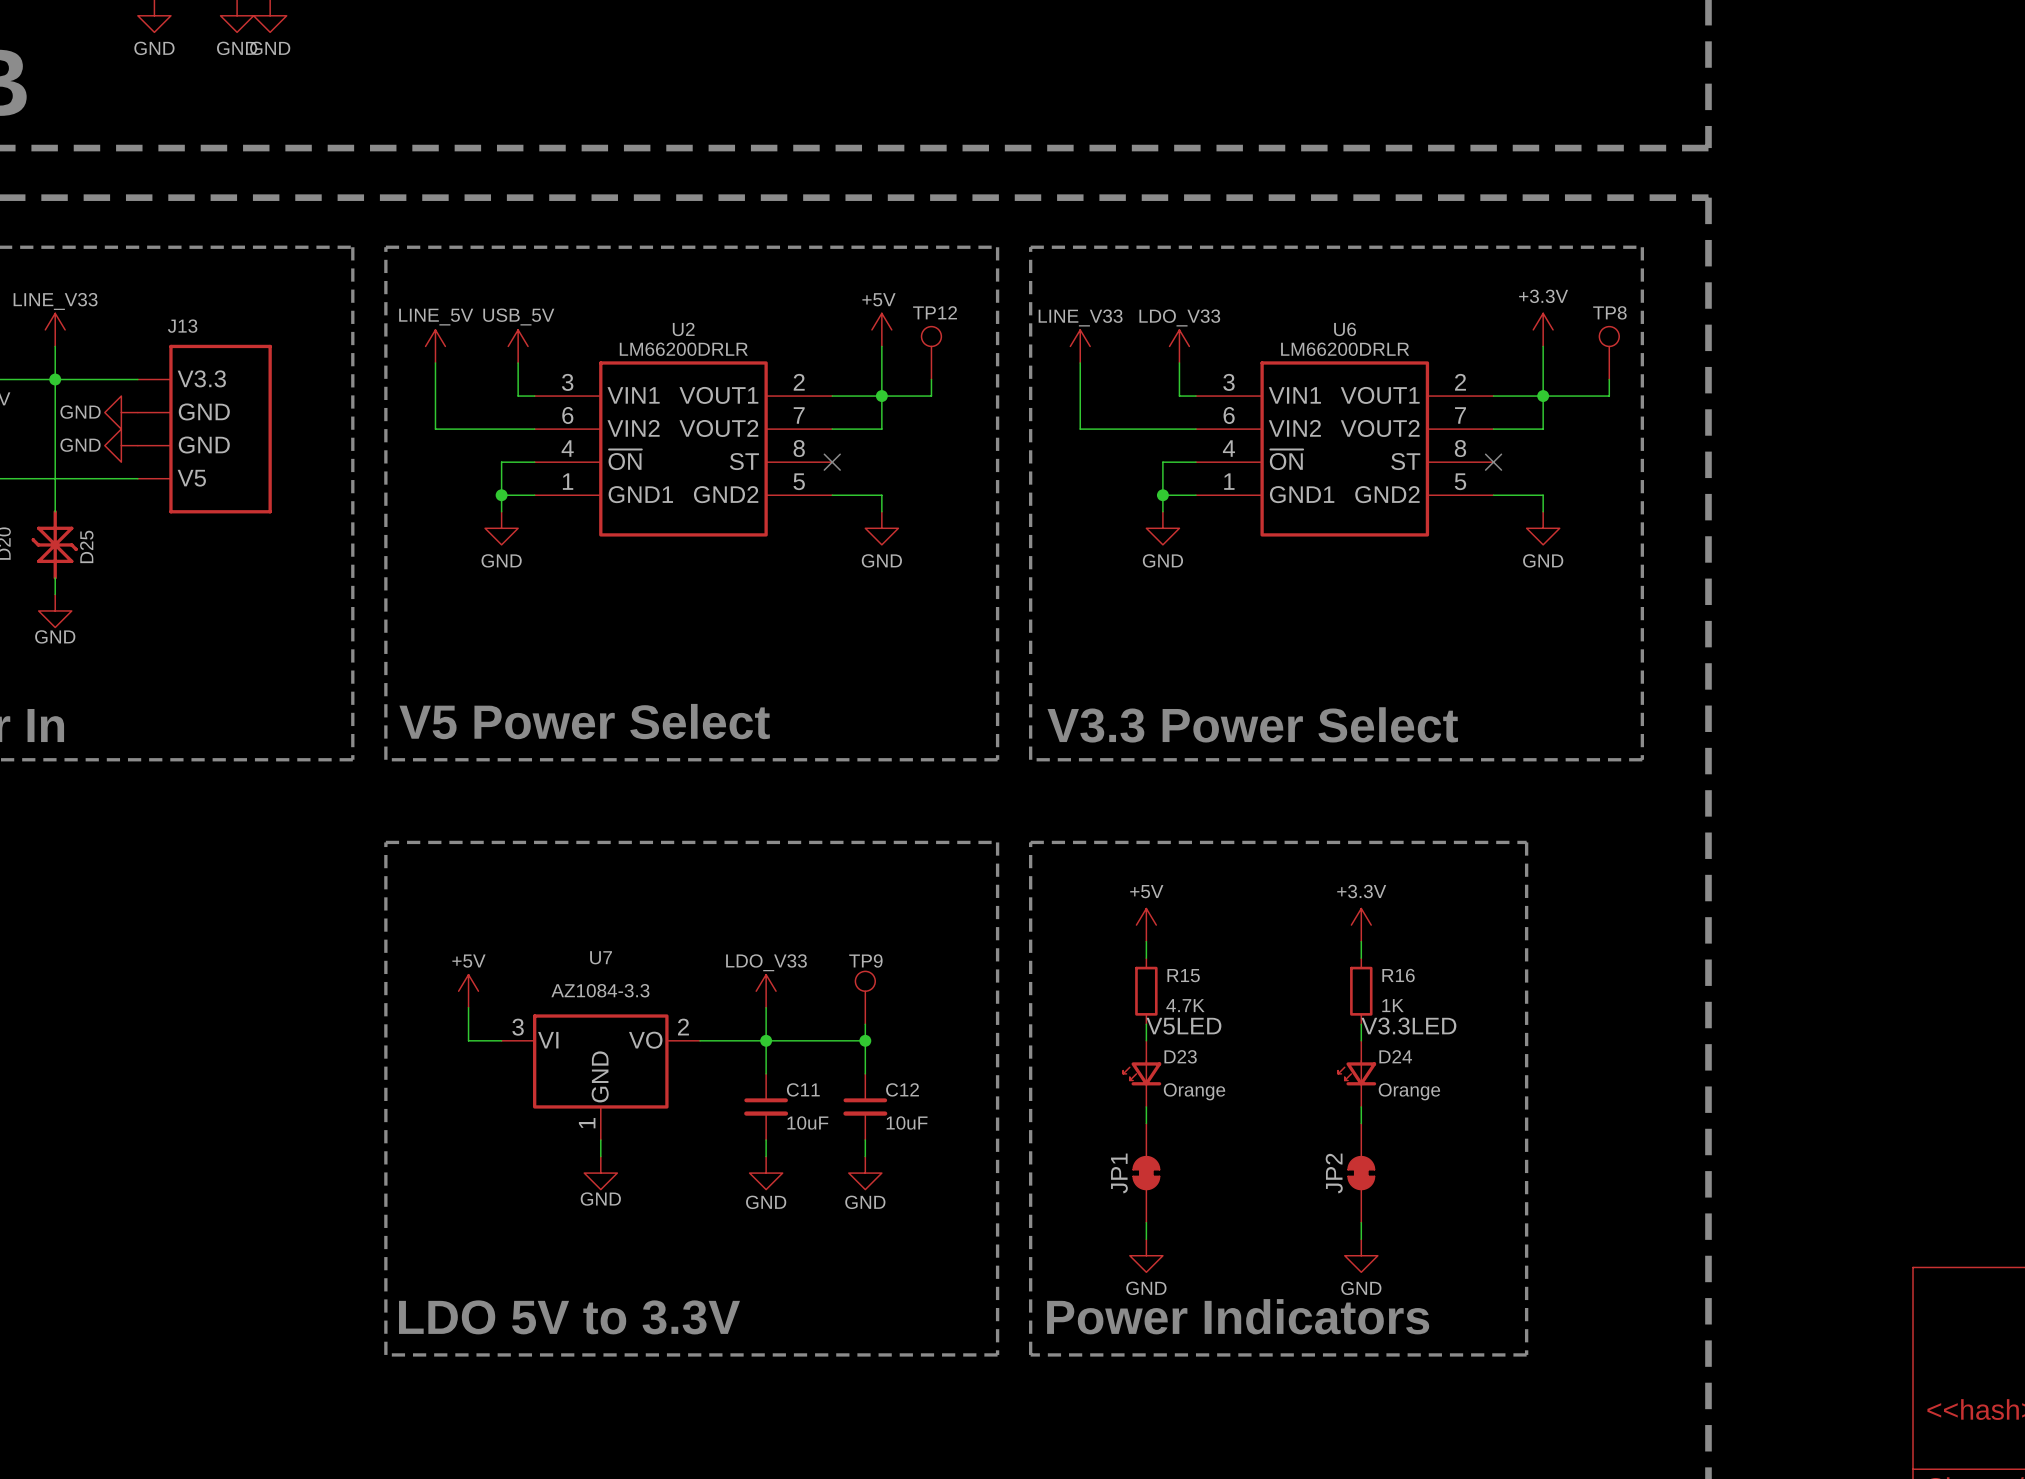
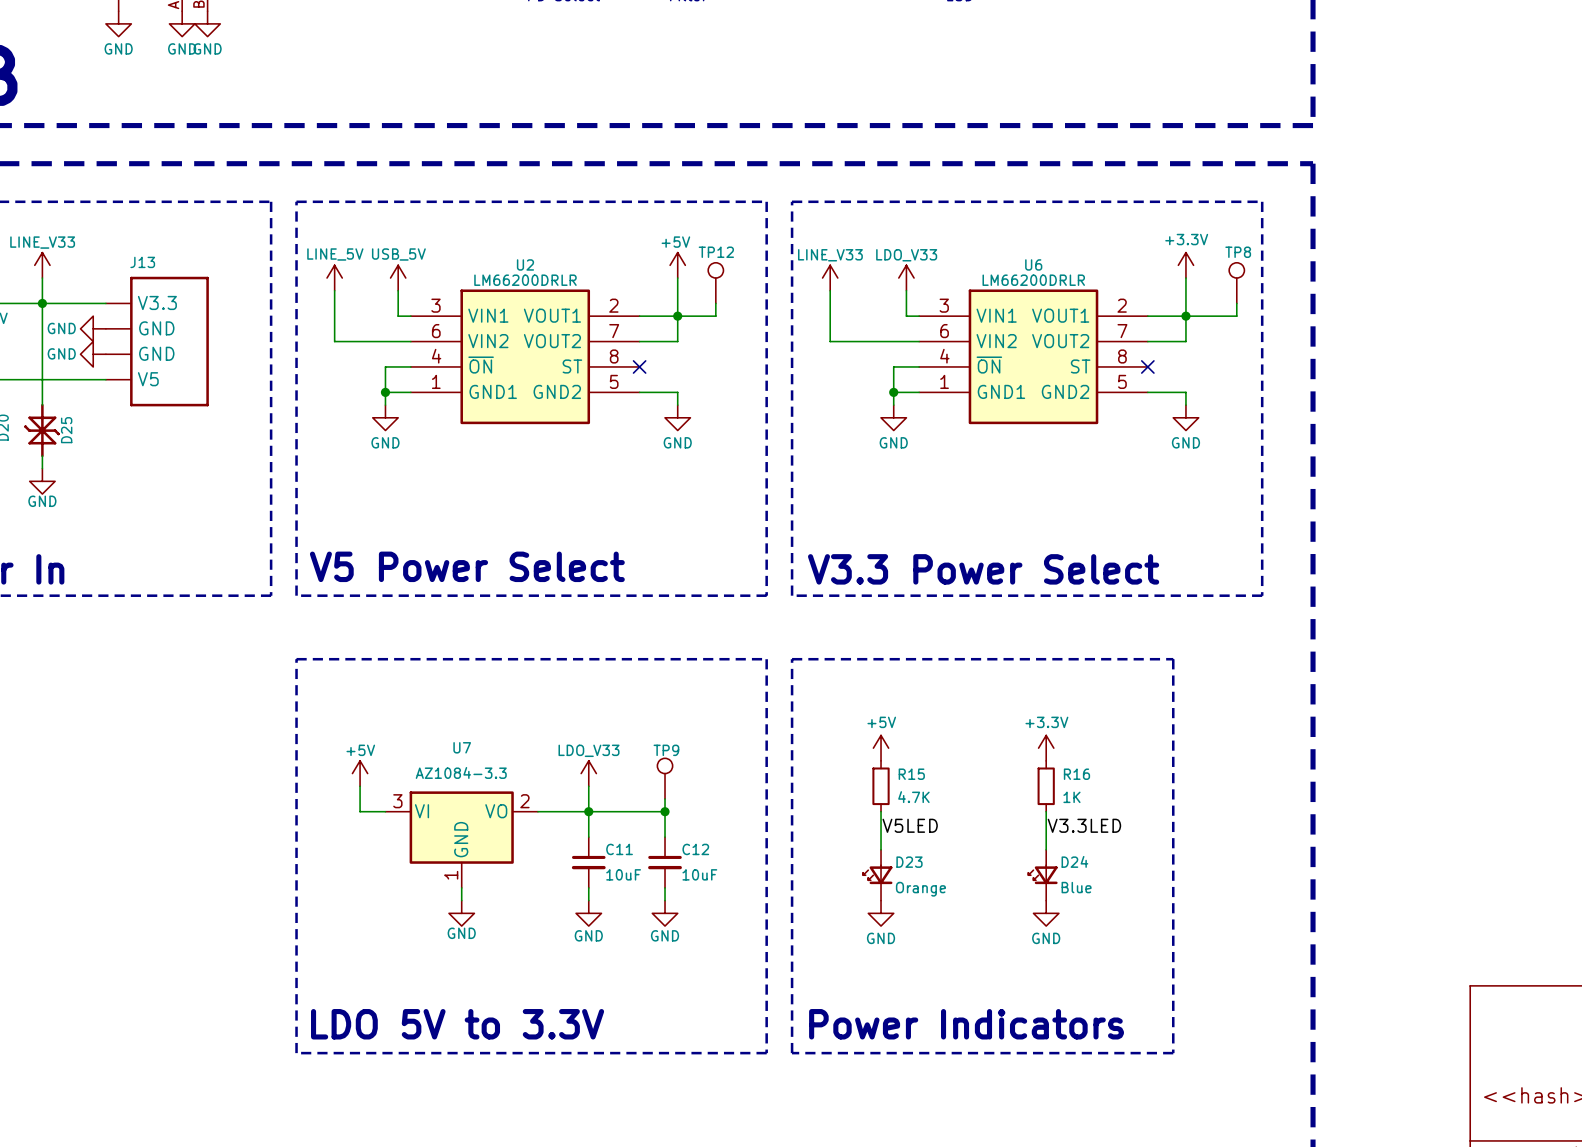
power symbol position: +5V (1146, 925) -> +5V (881, 748)
power symbol position: +3.3V (1361, 925) -> +3.3V (1046, 748)
R15 position: (1146, 991) -> (881, 786)
R16 position: (1361, 991) -> (1046, 786)
label position: V5LED (1183, 1026) -> V5LED (910, 825)
label position: V3.3LED (1408, 1026) -> V3.3LED (1084, 825)
D23 position: (1142, 1073) -> (877, 875)
D24 position: (1357, 1073) -> (1043, 875)
D24 value: Orange (1409, 1091) -> Blue (1076, 887)
JP1: (1146, 1173) -> none
JP2: (1361, 1173) -> none
wire: (1146, 1222) (1146, 1239) -> none
wire: (1361, 1222) (1361, 1239) -> none
power symbol position: GND (1146, 1255) -> GND (881, 913)
power symbol position: GND (1361, 1255) -> GND (1046, 913)

